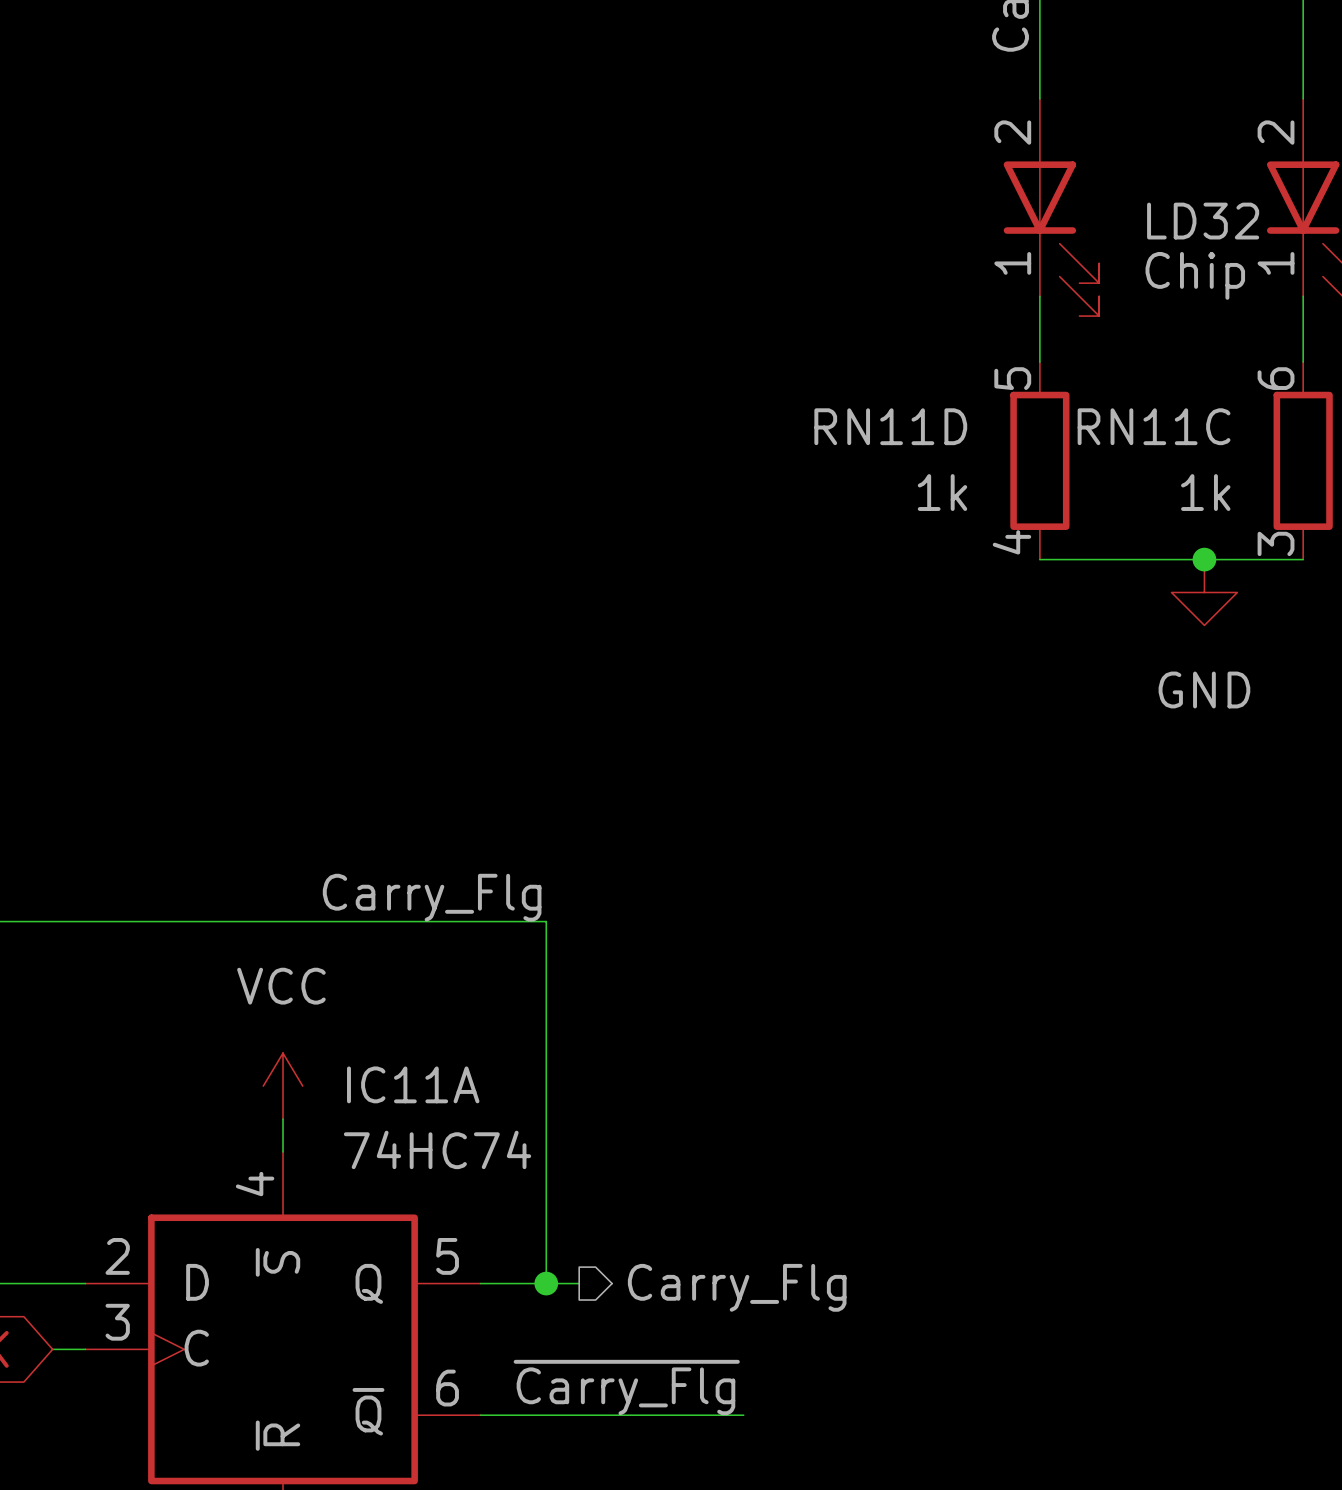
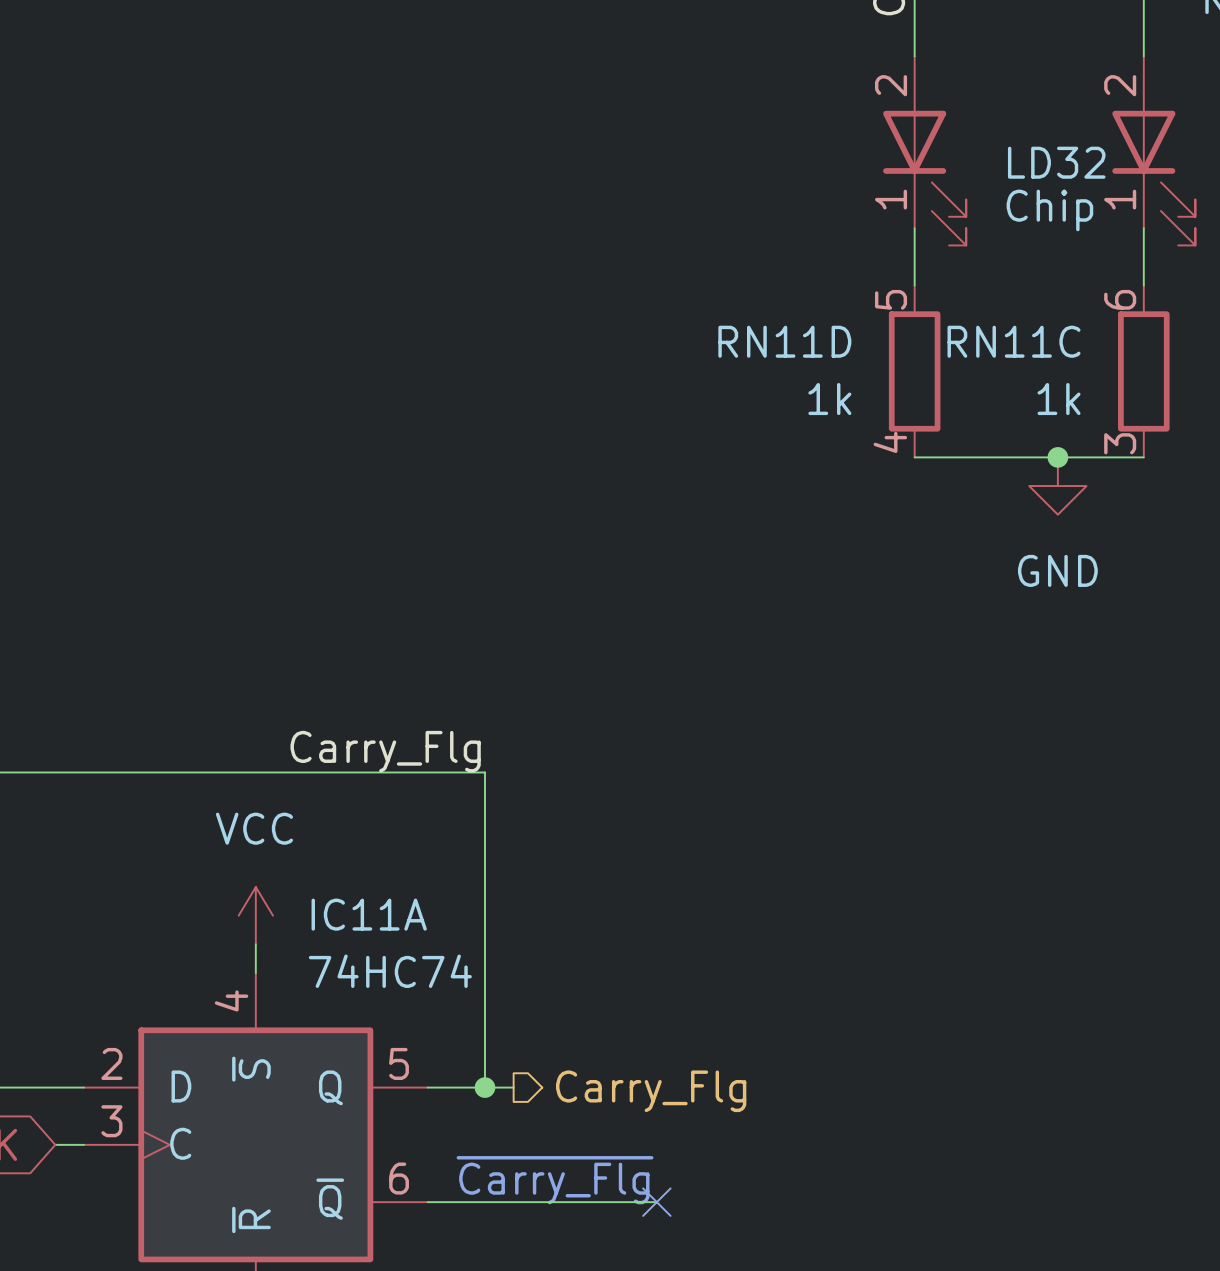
label: ~{Carry_Flg} (626, 1387) -> none
text: none -> ~{Carry_Flg} (555, 1180)
no-connect mark: none -> (656, 1202)

